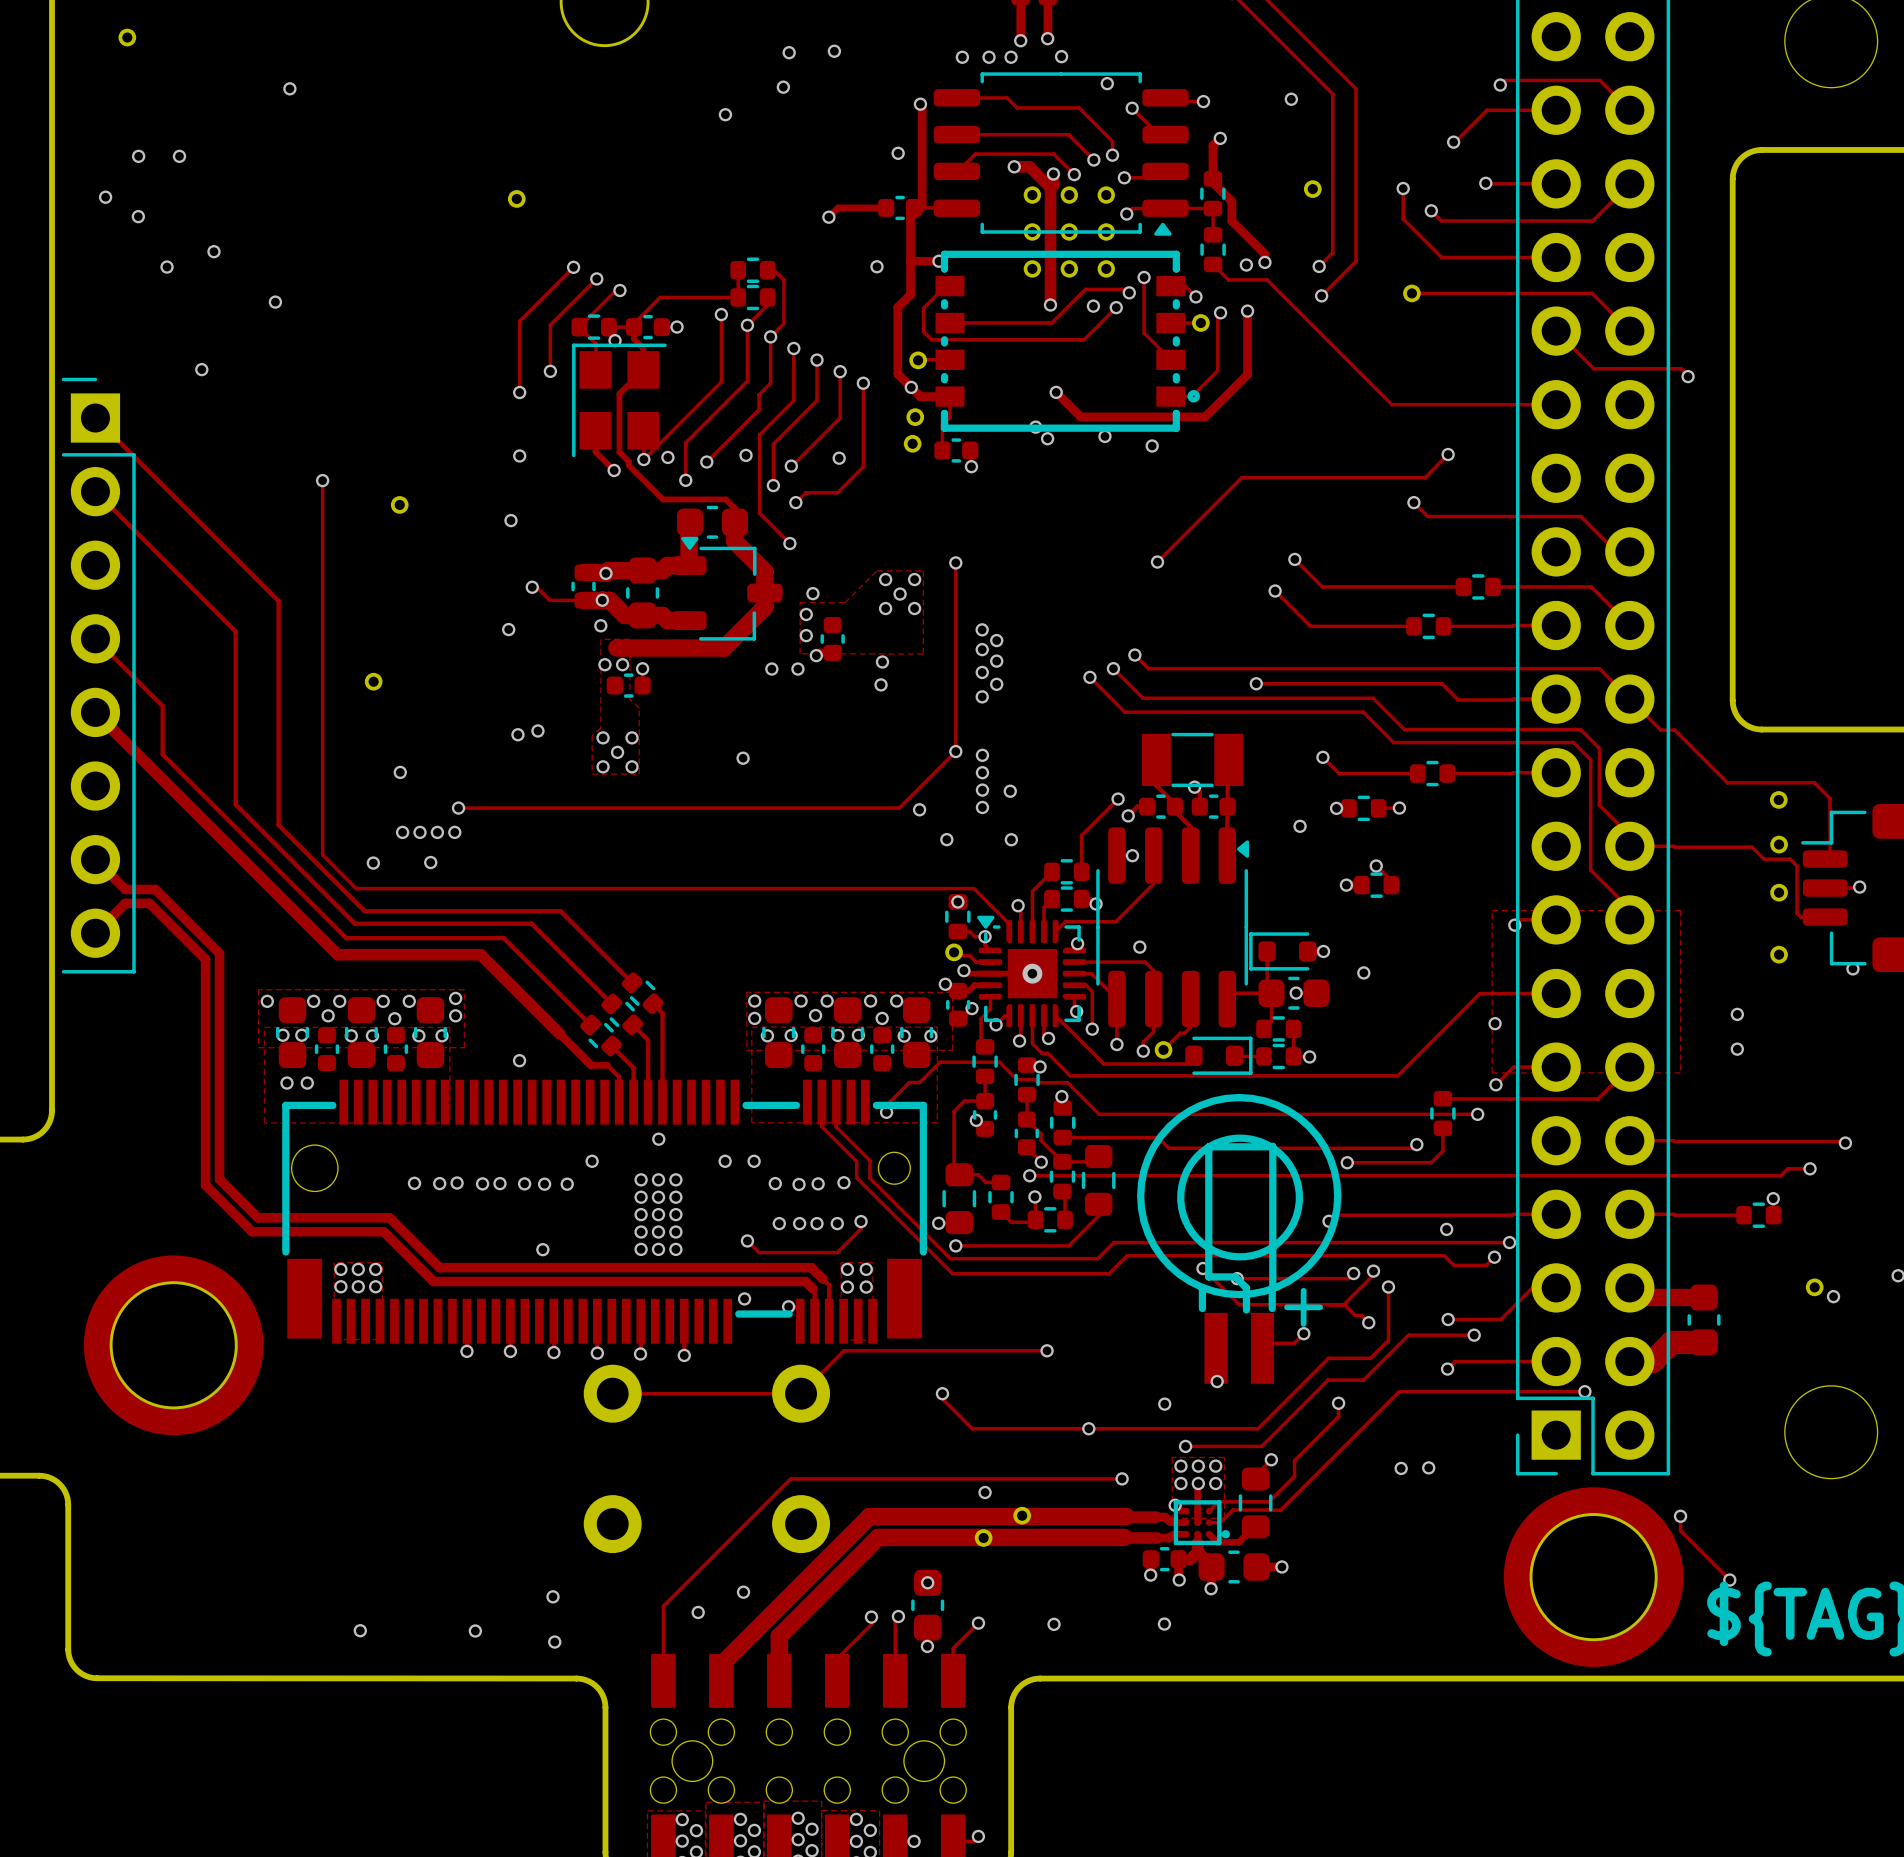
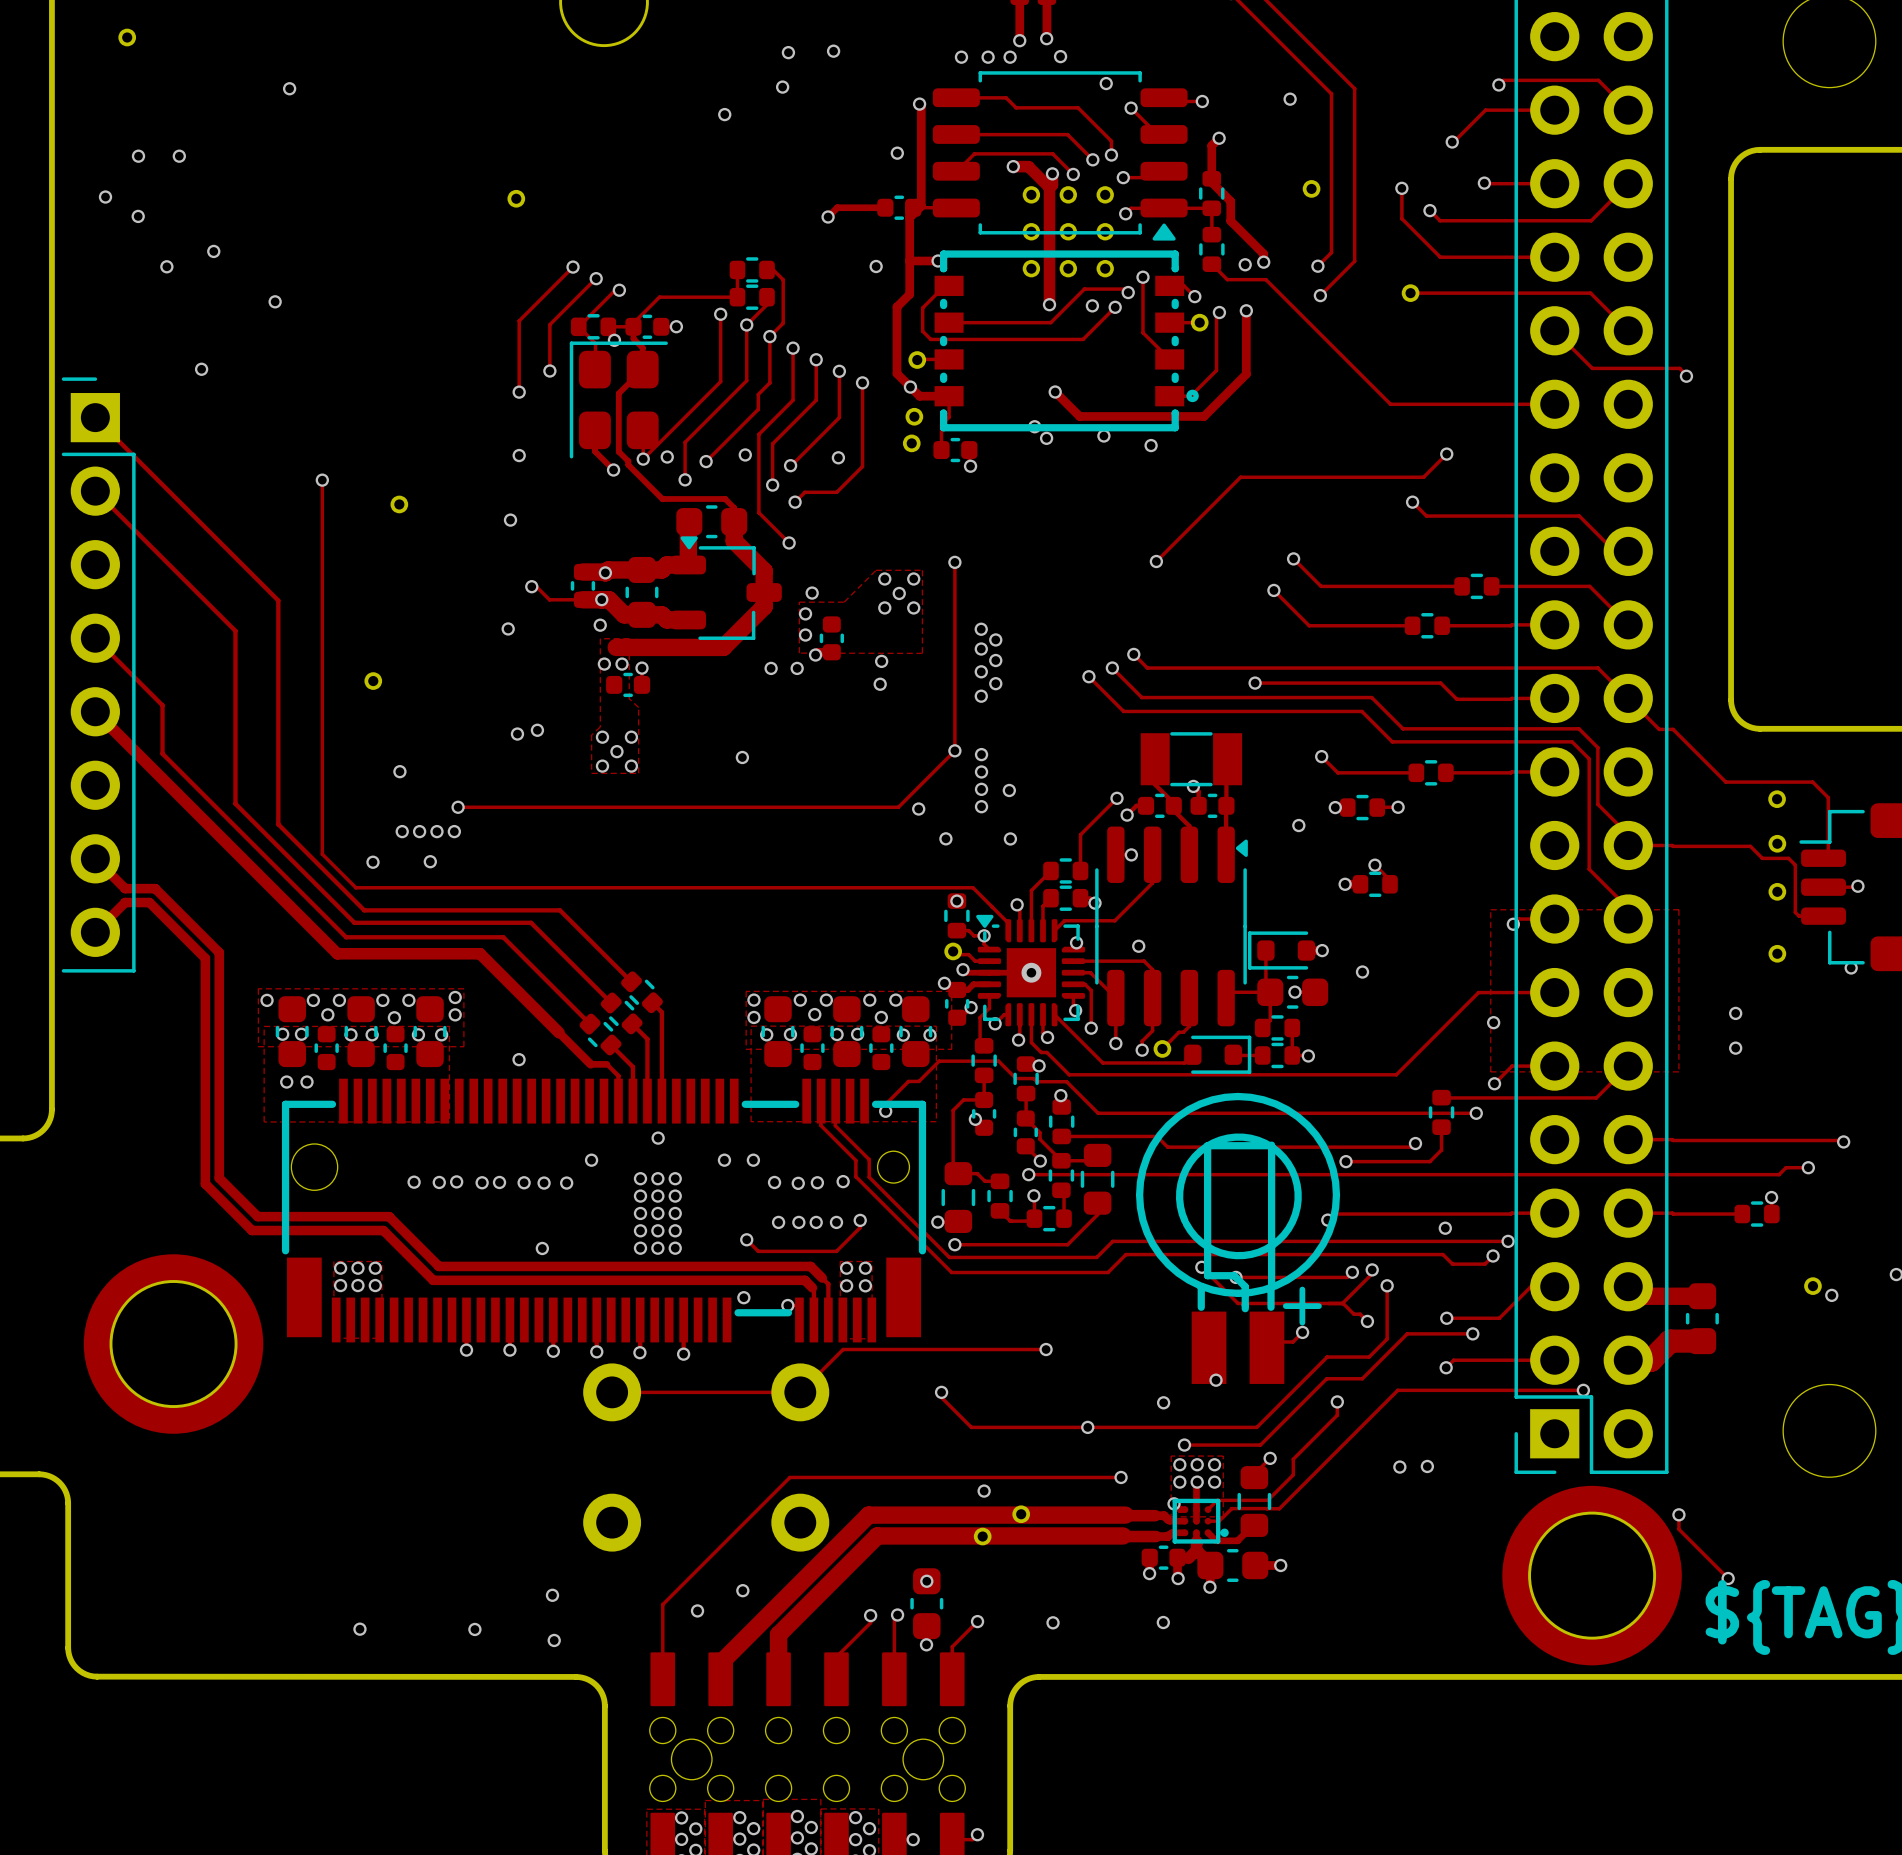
part footprint: [933, 72, 1189, 236] -> [932, 71, 1188, 241]
part footprint: [572, 343, 667, 458] -> [569, 341, 668, 459]
part footprint: [1137, 1093, 1342, 1384] -> [1135, 1092, 1341, 1384]

